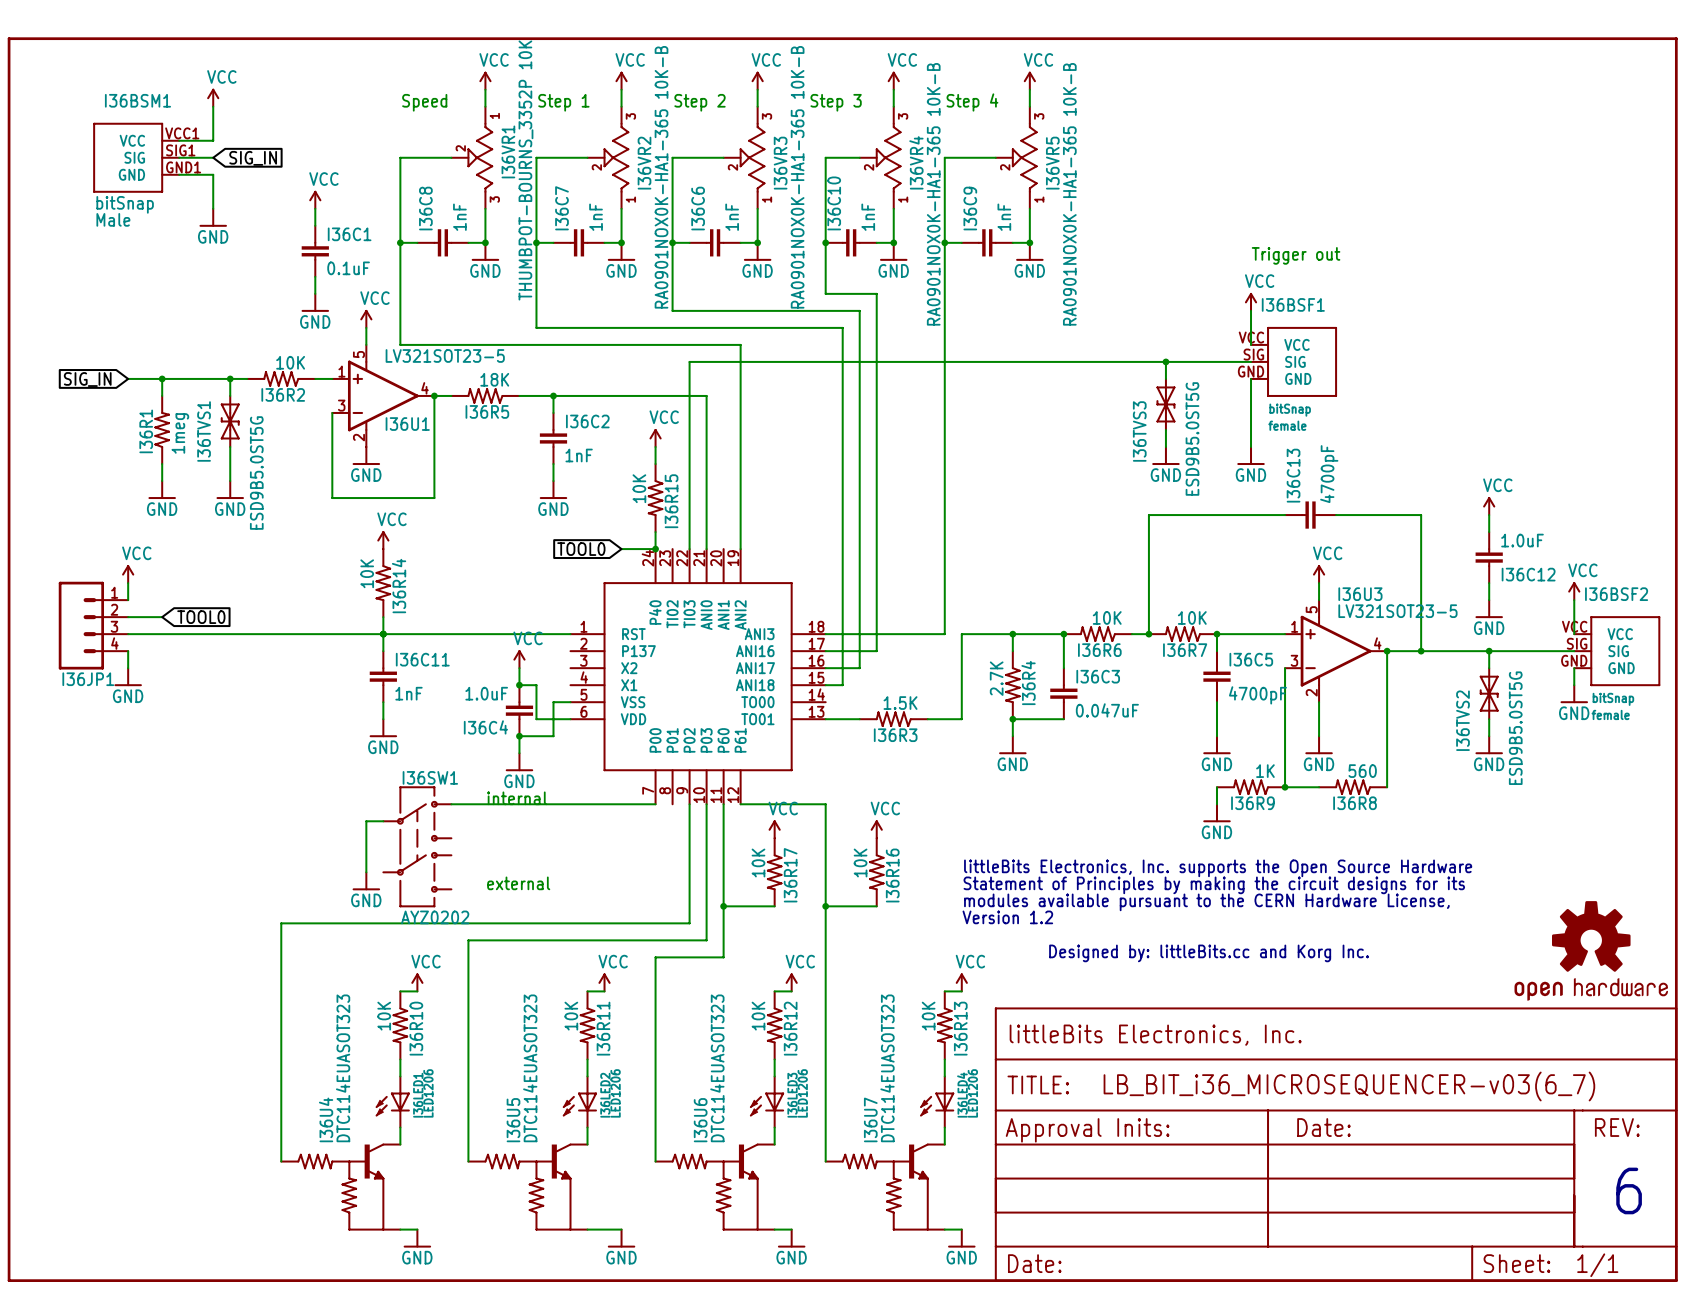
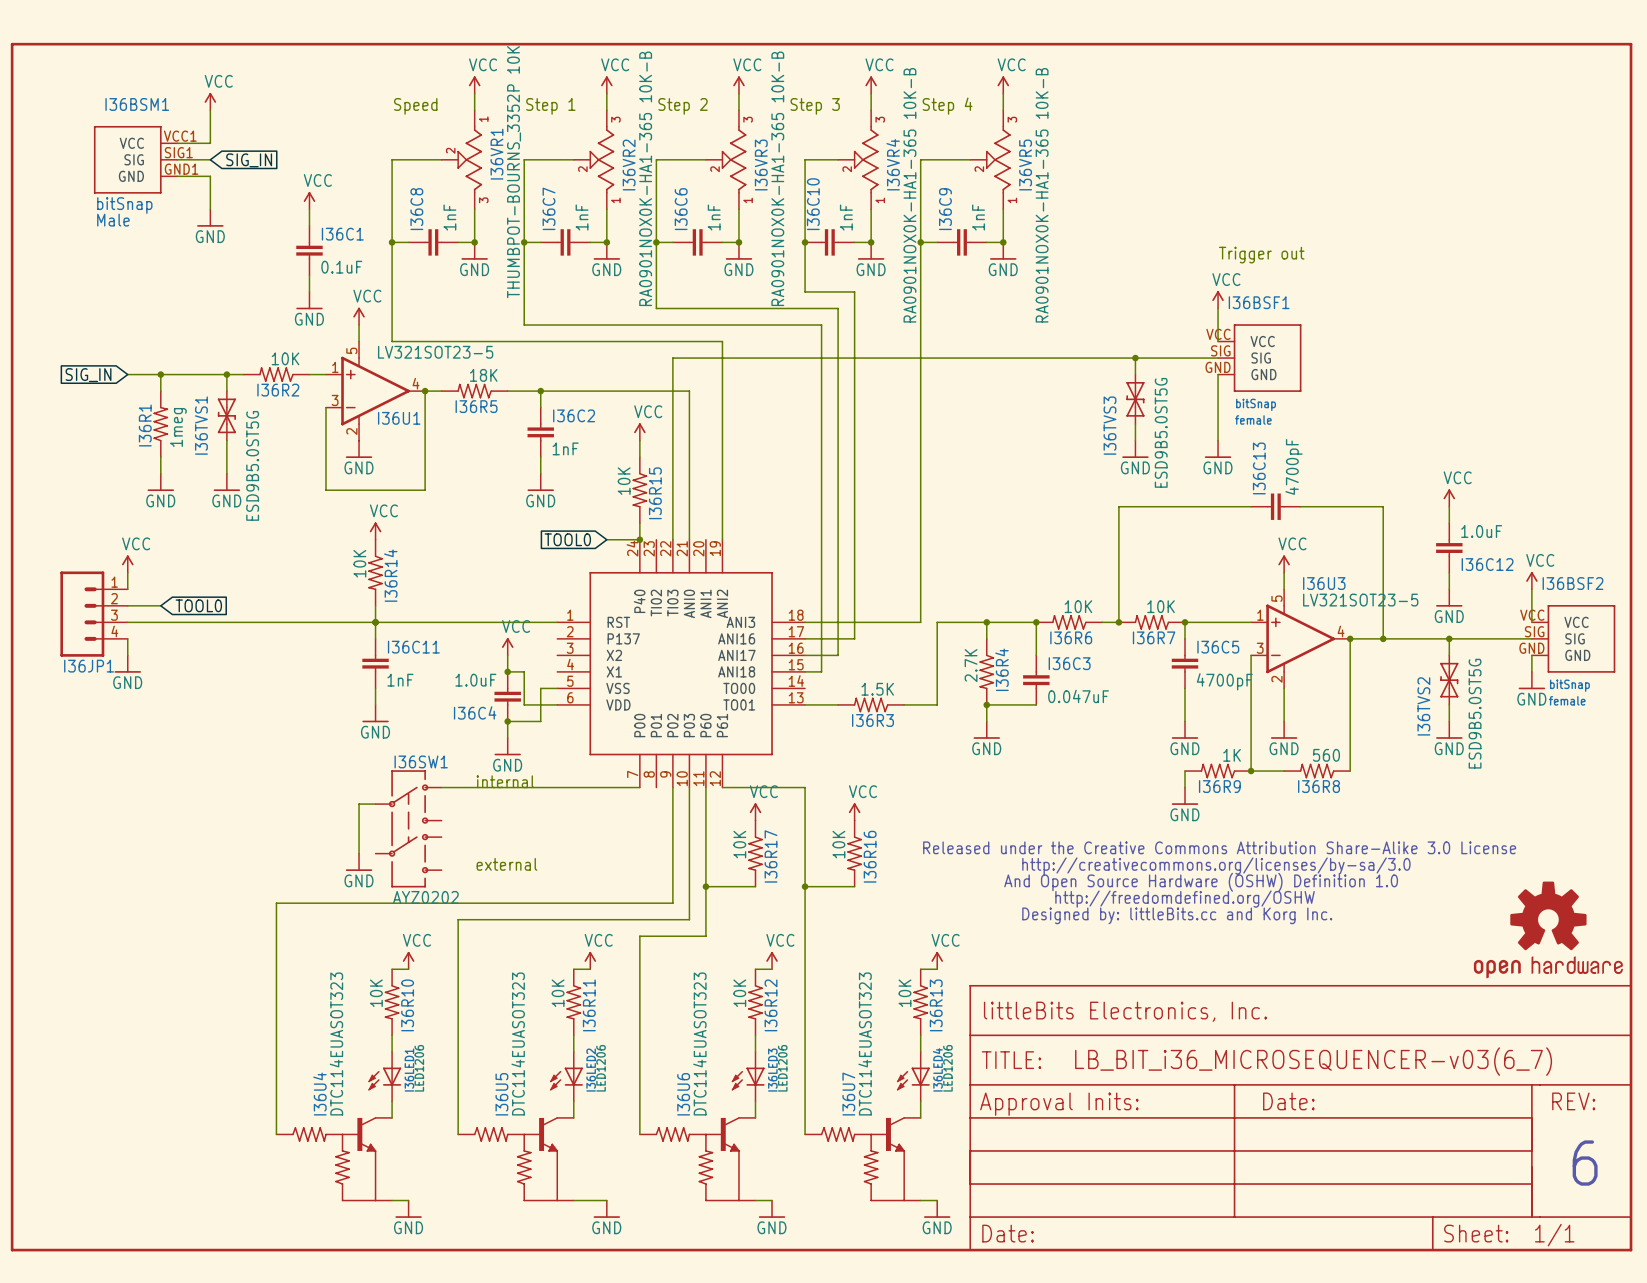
part: none -> (1219, 882)
part: (1217, 910) -> none

